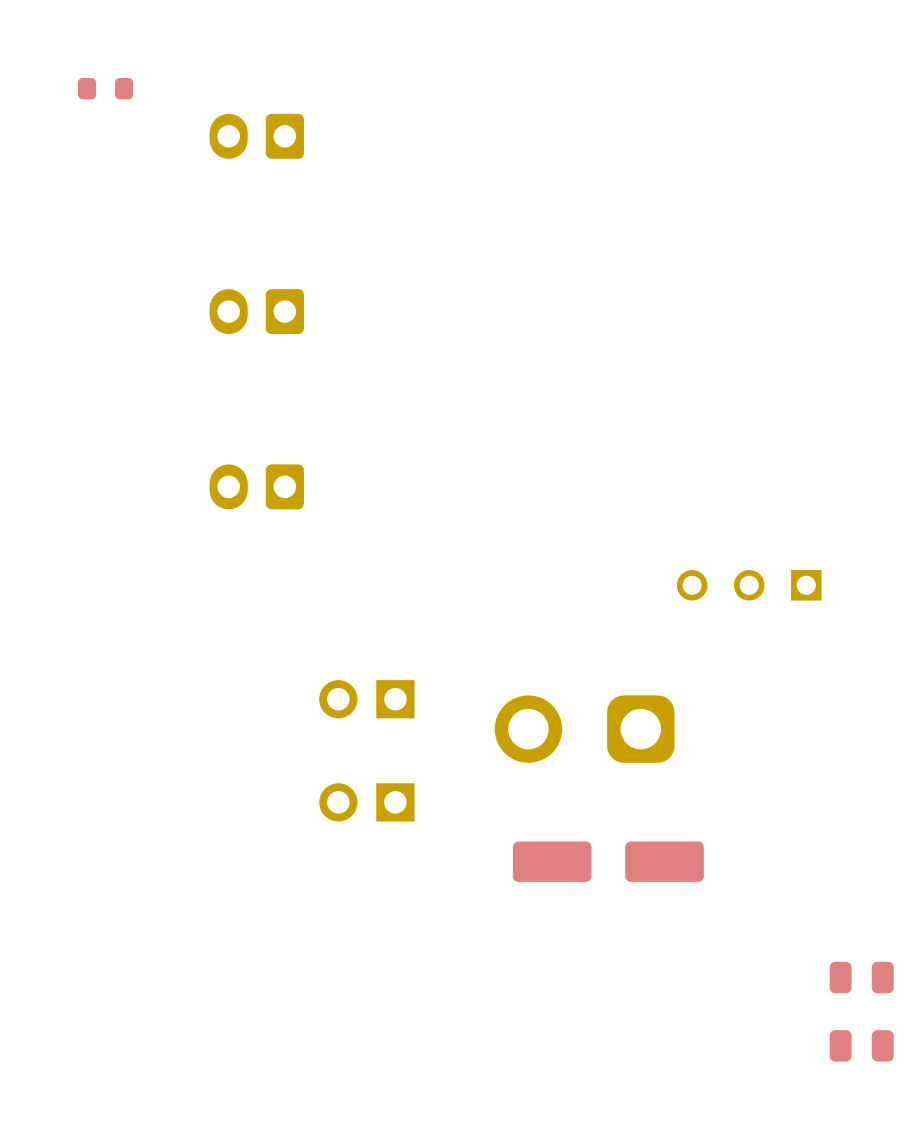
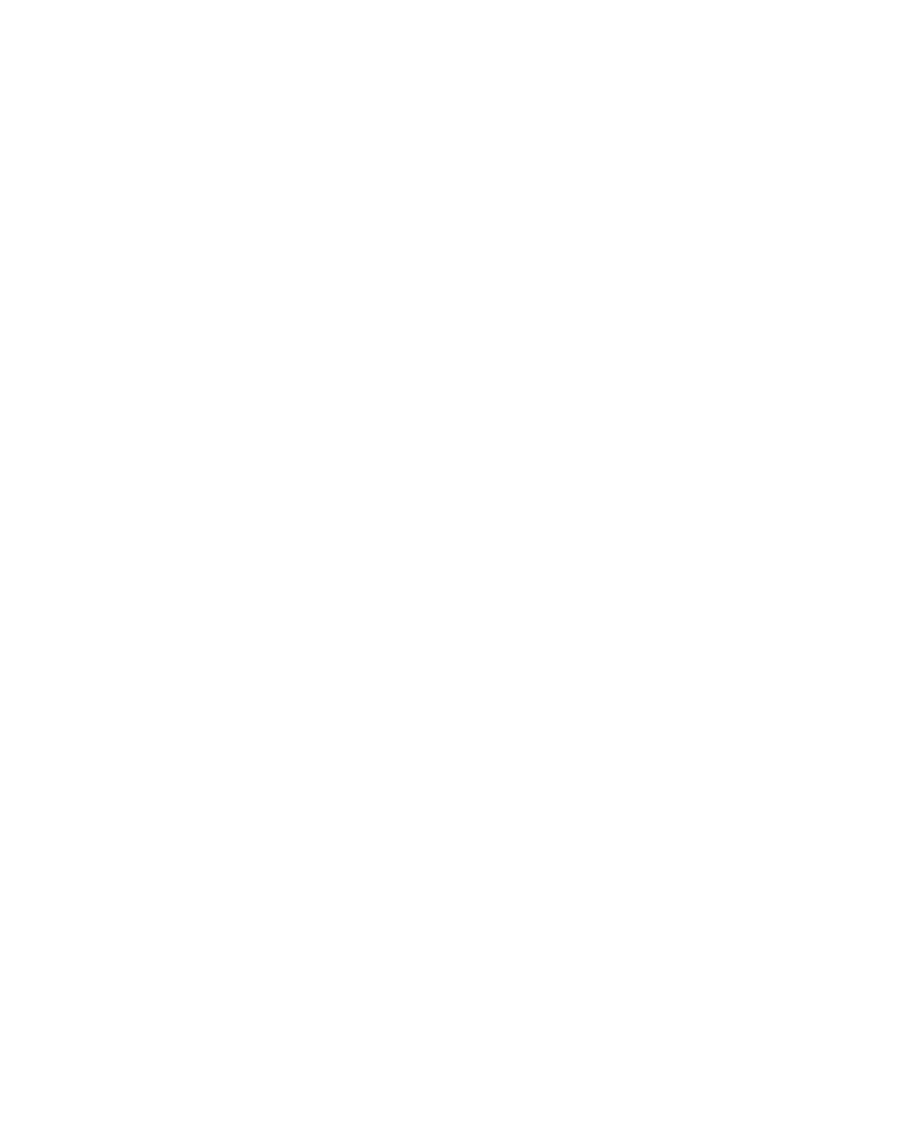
part: (105, 88) -> none
part: (256, 136) -> none
part: (256, 311) -> none
part: (256, 486) -> none
part: (749, 585) -> none
part: (366, 699) -> none
part: (584, 729) -> none
part: (366, 802) -> none
part: (608, 861) -> none
part: (861, 977) -> none
part: (861, 1045) -> none

